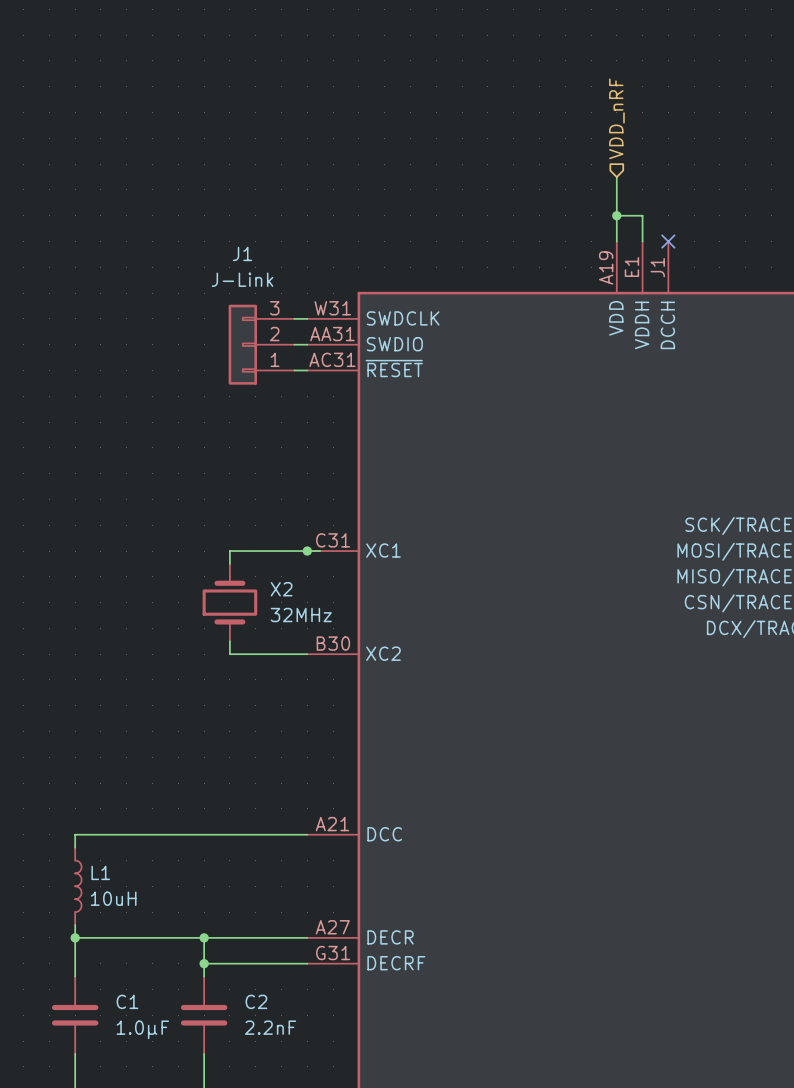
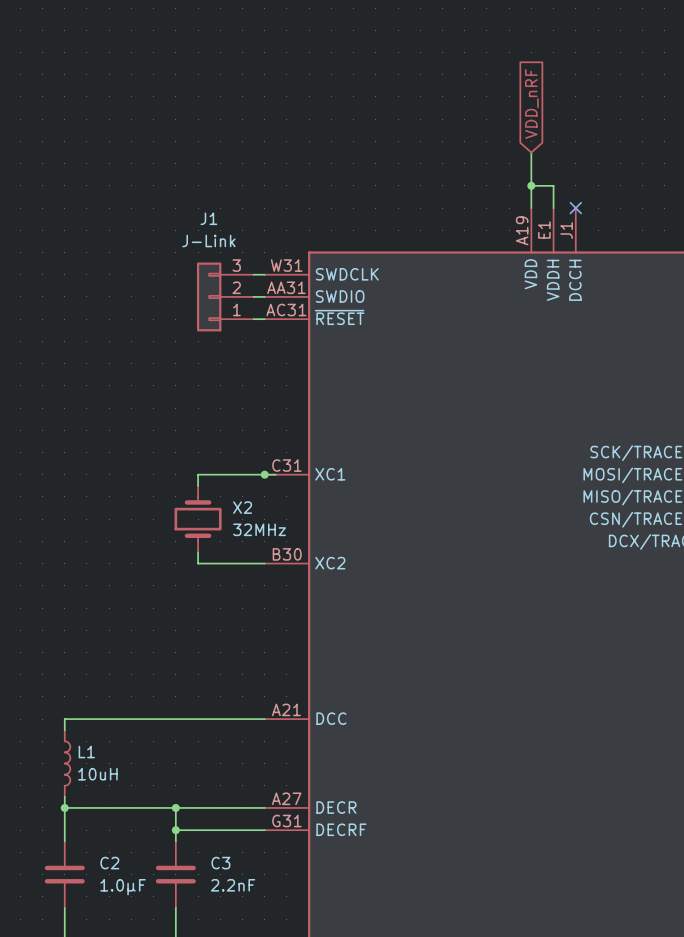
hierarchical label: VDD_nRF (616, 118) -> none
global label: none -> VDD_nRF (531, 103)
C1 name: C1 (127, 1001) -> C2 (109, 863)
C2 name: C2 (256, 1001) -> C3 (220, 863)

